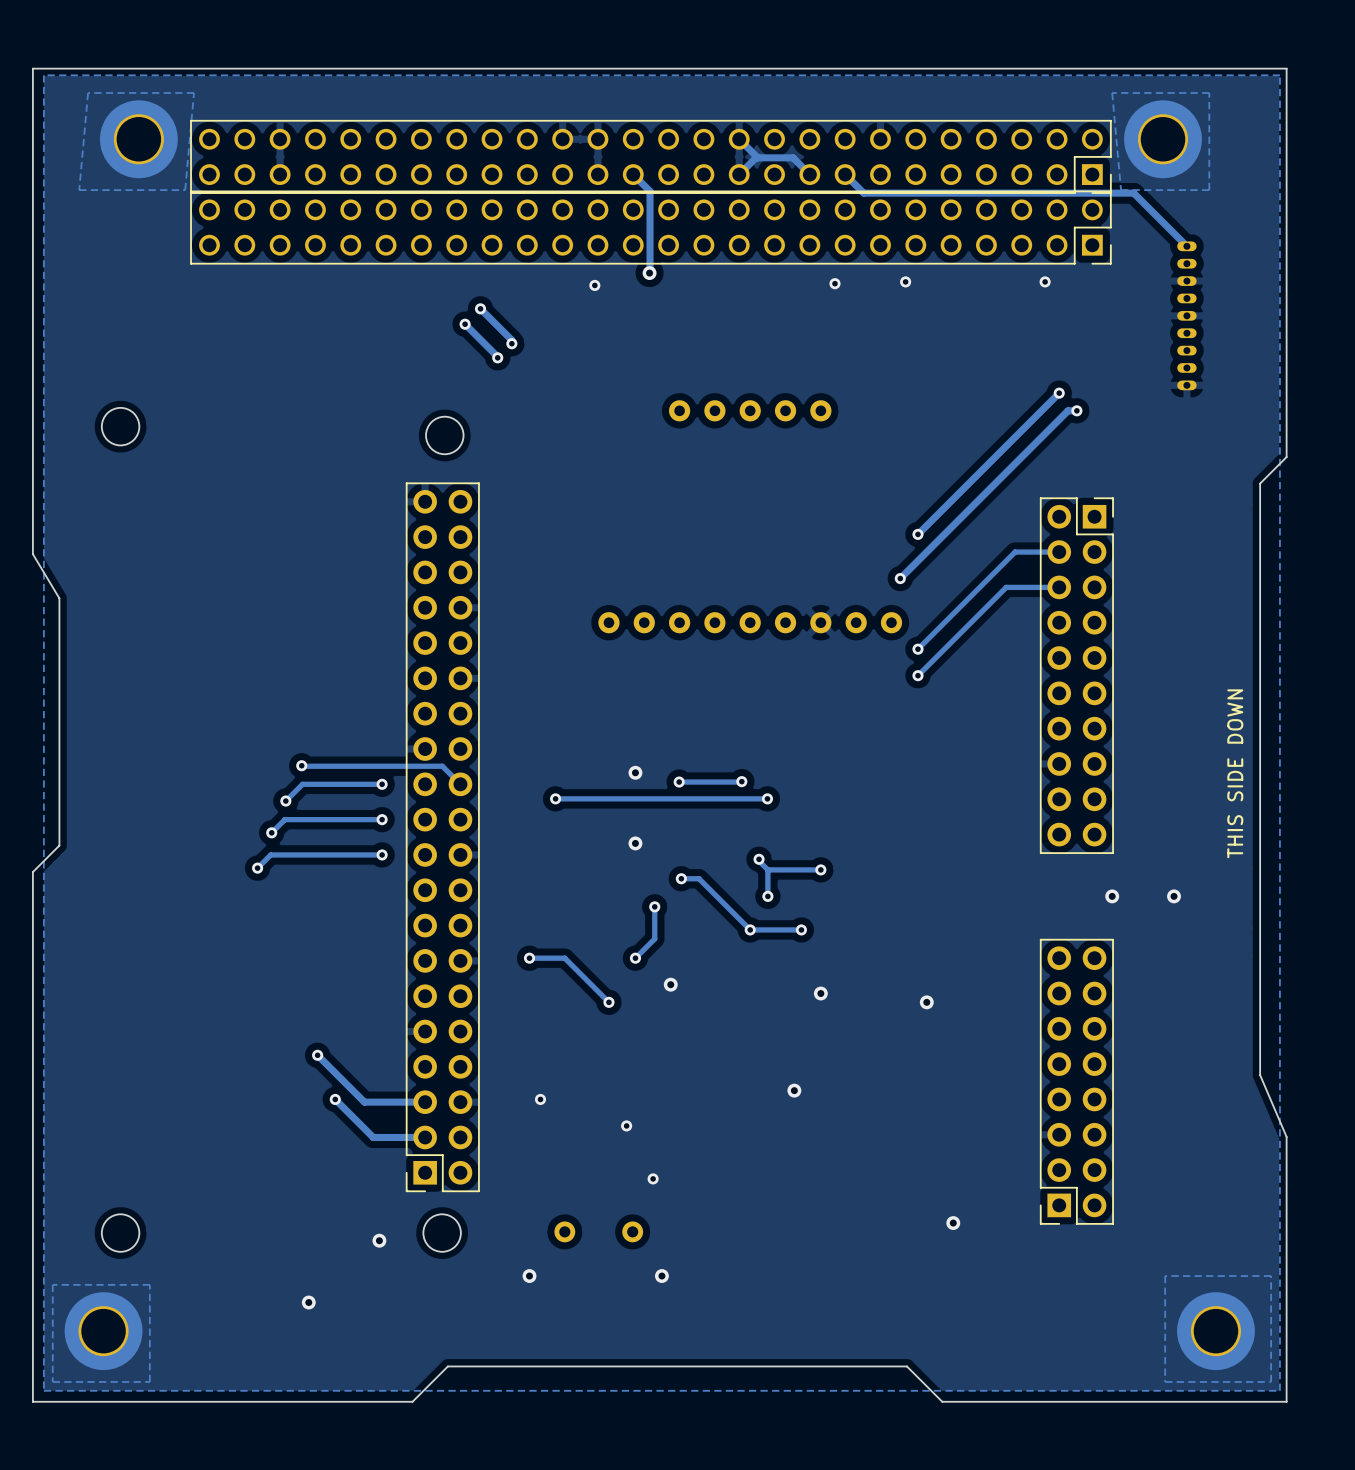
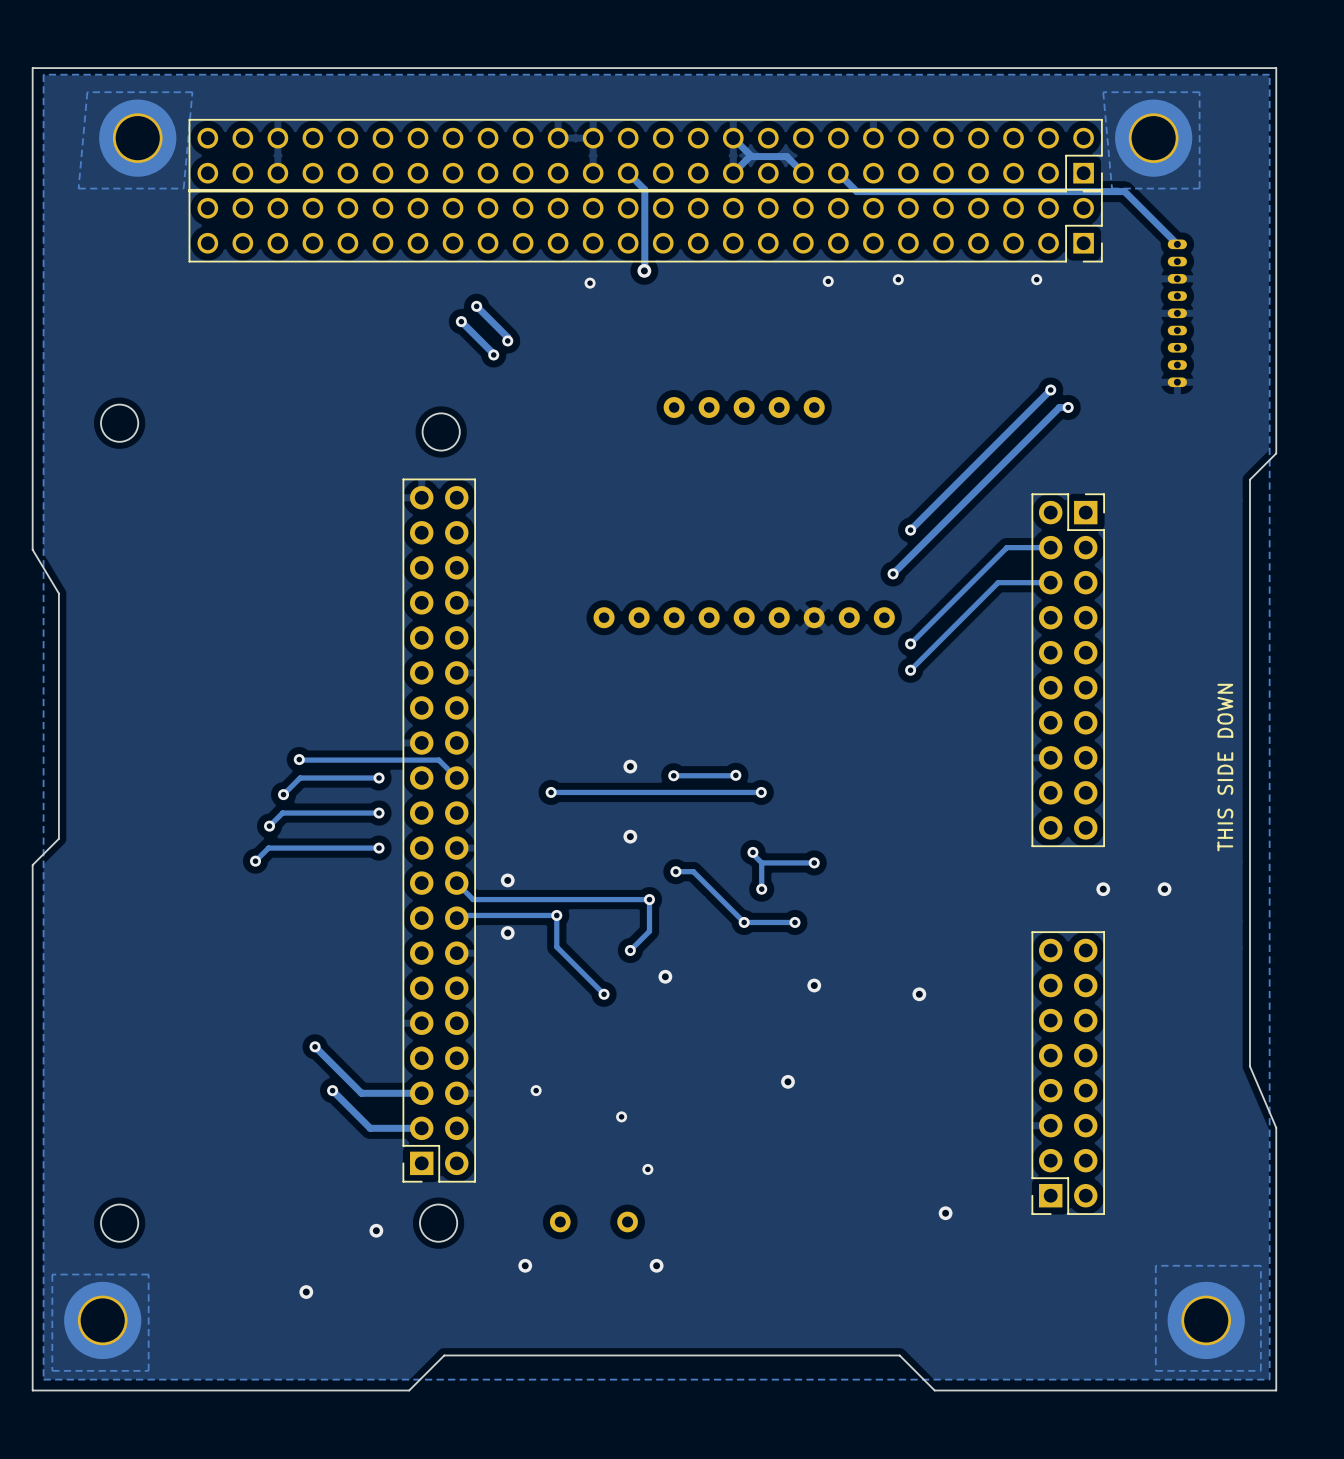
via: none -> (507, 880)
track: none -> (456, 883) (473, 899) (649, 899)
via: none -> (507, 932)
via position: (529, 958) -> (556, 915)
track: (564, 958) (529, 958) -> (560, 950) (556, 946) (556, 915) (459, 915) (456, 918)

